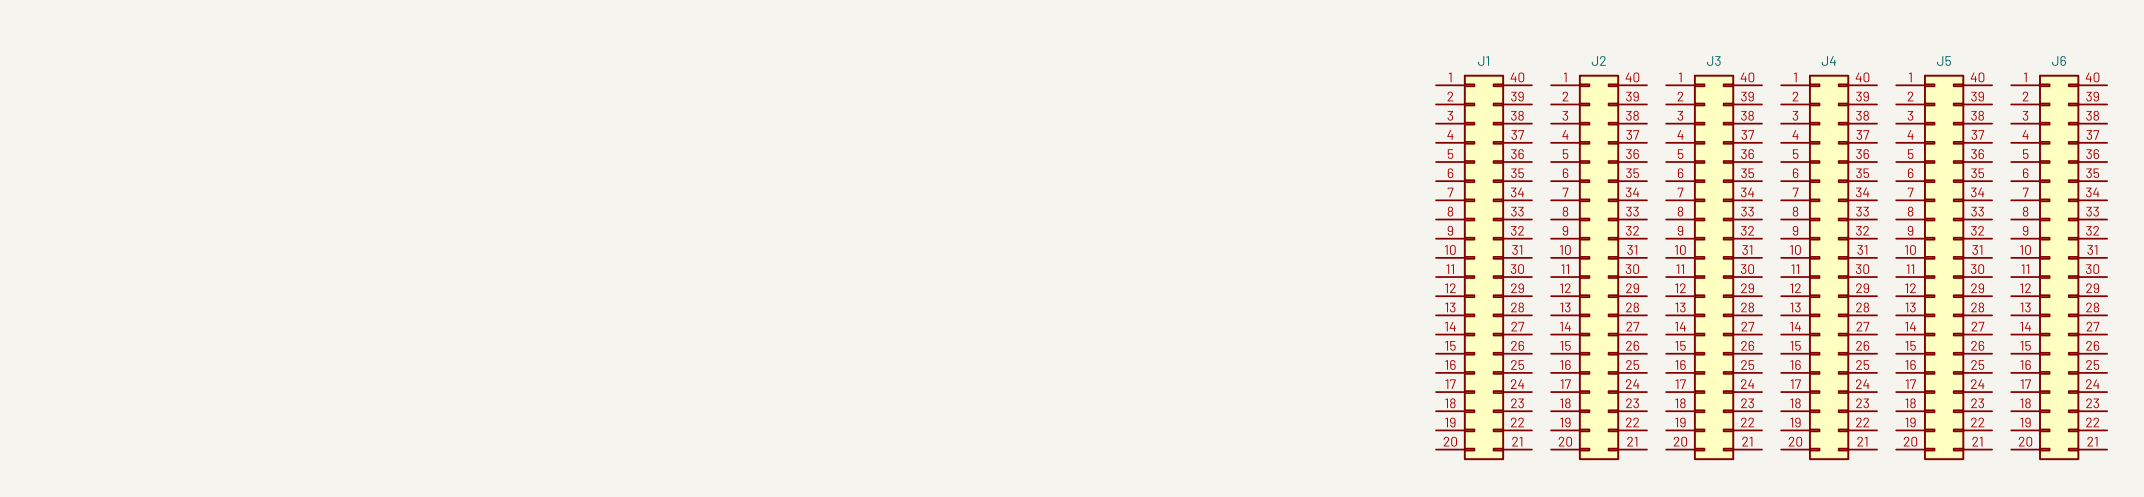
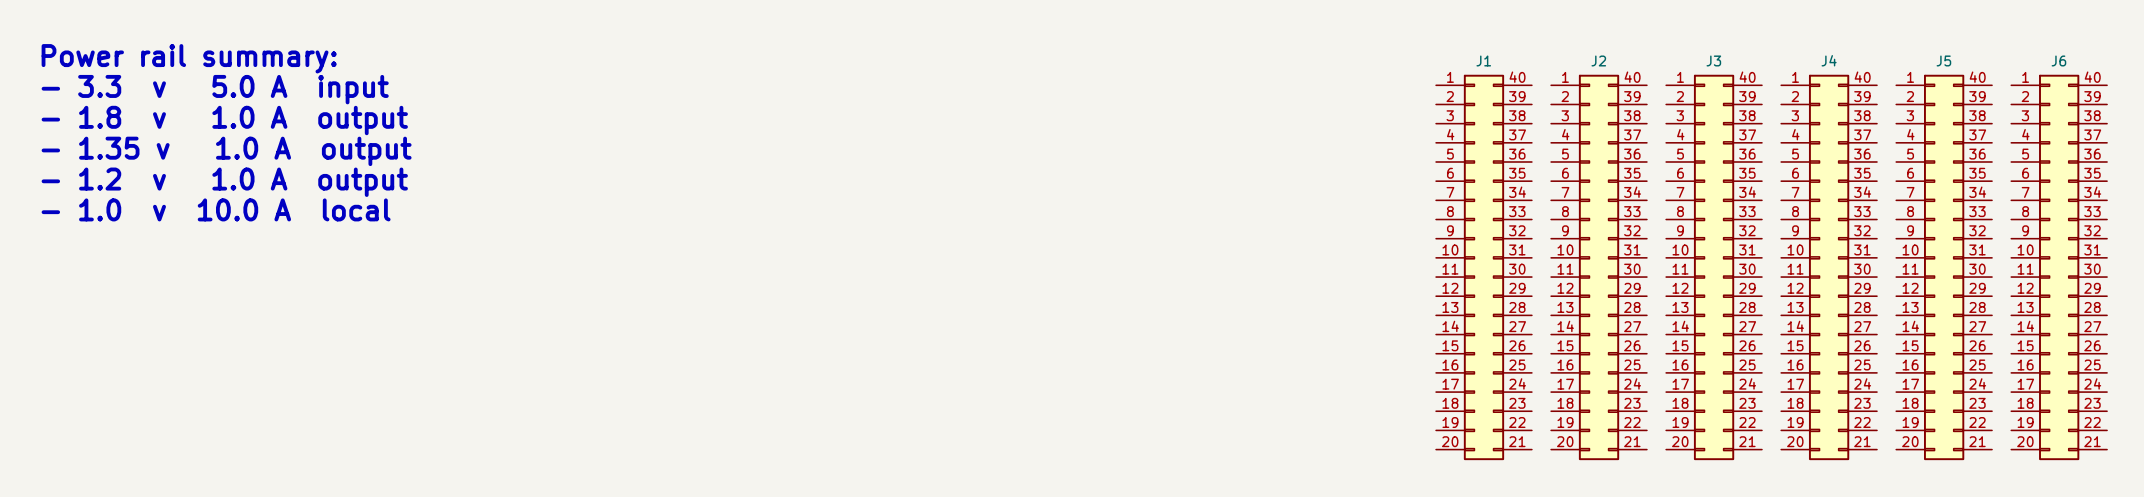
text: none -> Power rail summary: (189, 58)
text: none -> - 3.3 v 5.0 A input (215, 89)
text: none -> - 1.8 v 1.0 A output (224, 120)
text: none -> - 1.35 v 1.0 A output (226, 151)
text: none -> - 1.2 v 1.0 A output (224, 182)
text: none -> - 1.0 v 10.0 A local (216, 209)

